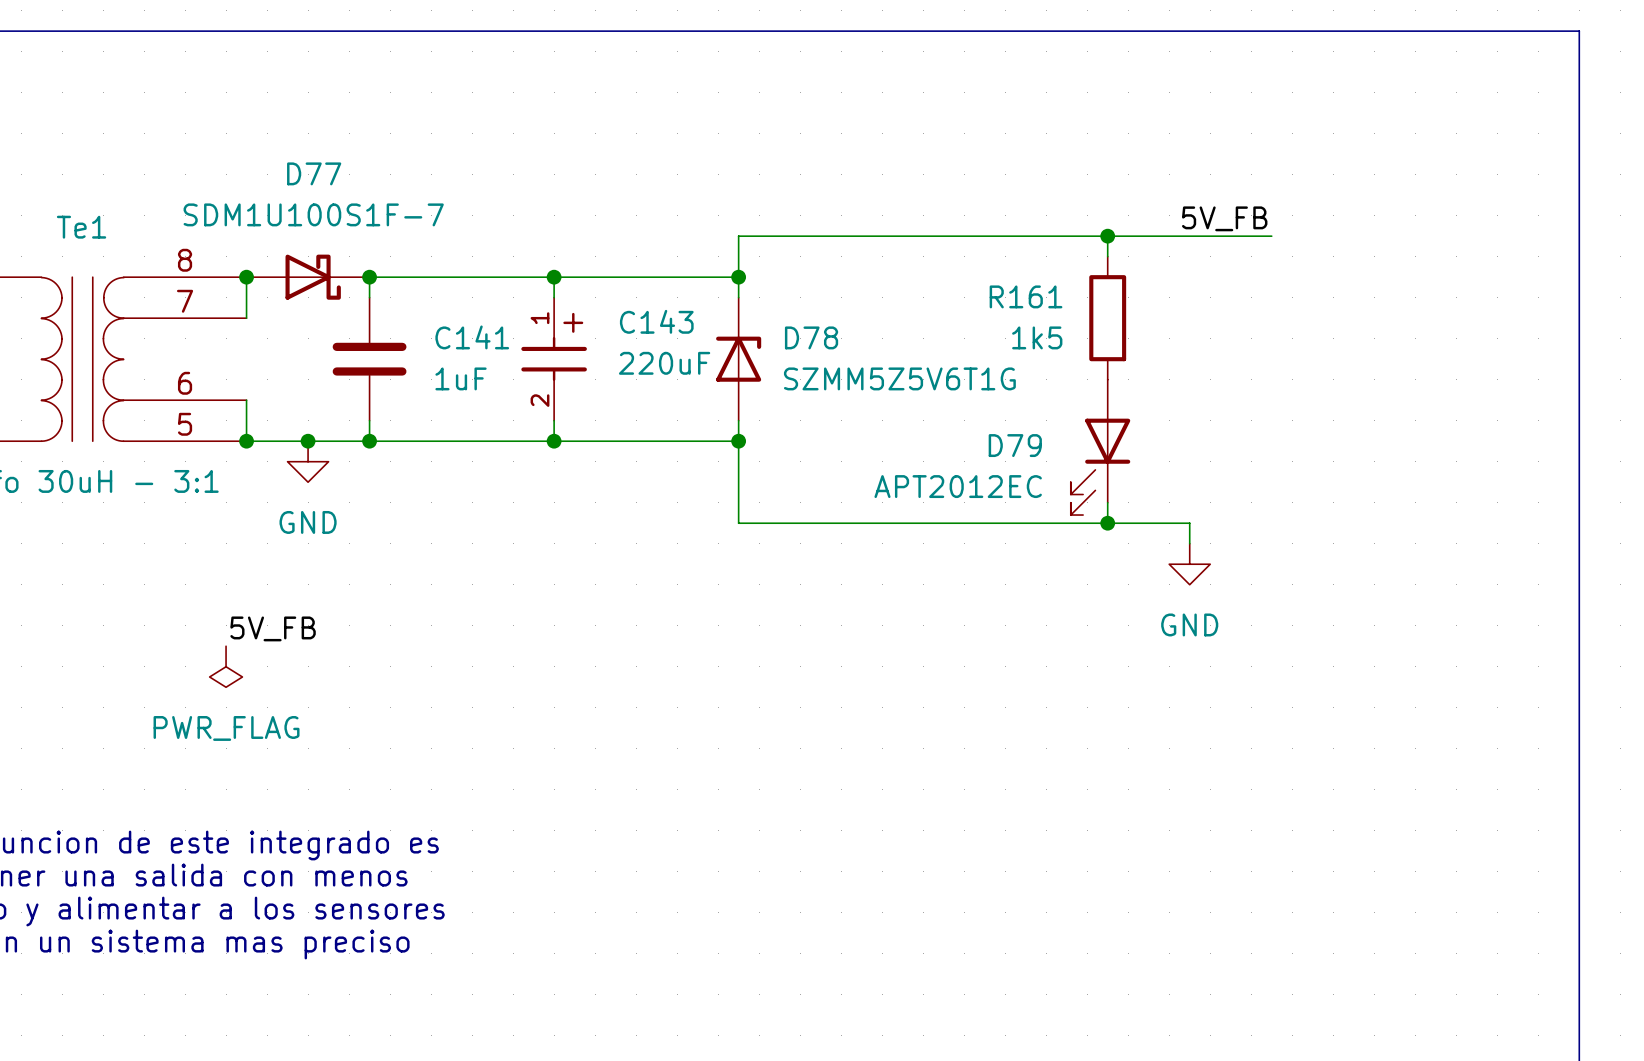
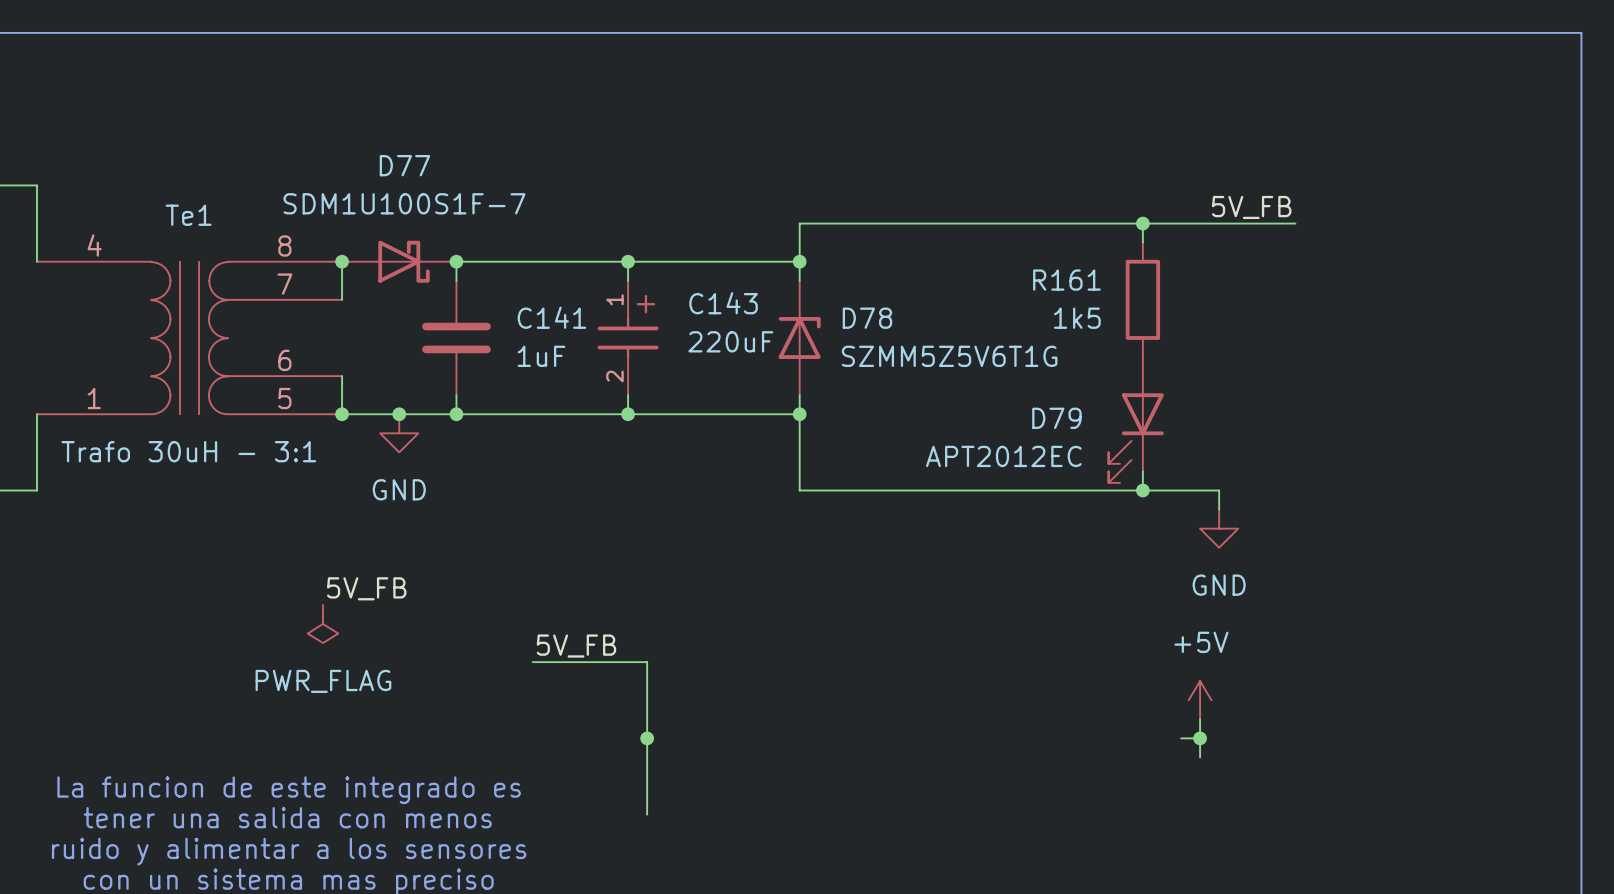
label: none -> 5V_FB (576, 646)
wire: none -> (532, 662) (647, 662) (647, 814)
power symbol: none -> +5V (1200, 700)
wire: none -> (1200, 719) (1200, 757)
junction: none -> (647, 738)
wire: none -> (1181, 738) (1200, 738)
junction: none -> (1200, 738)

